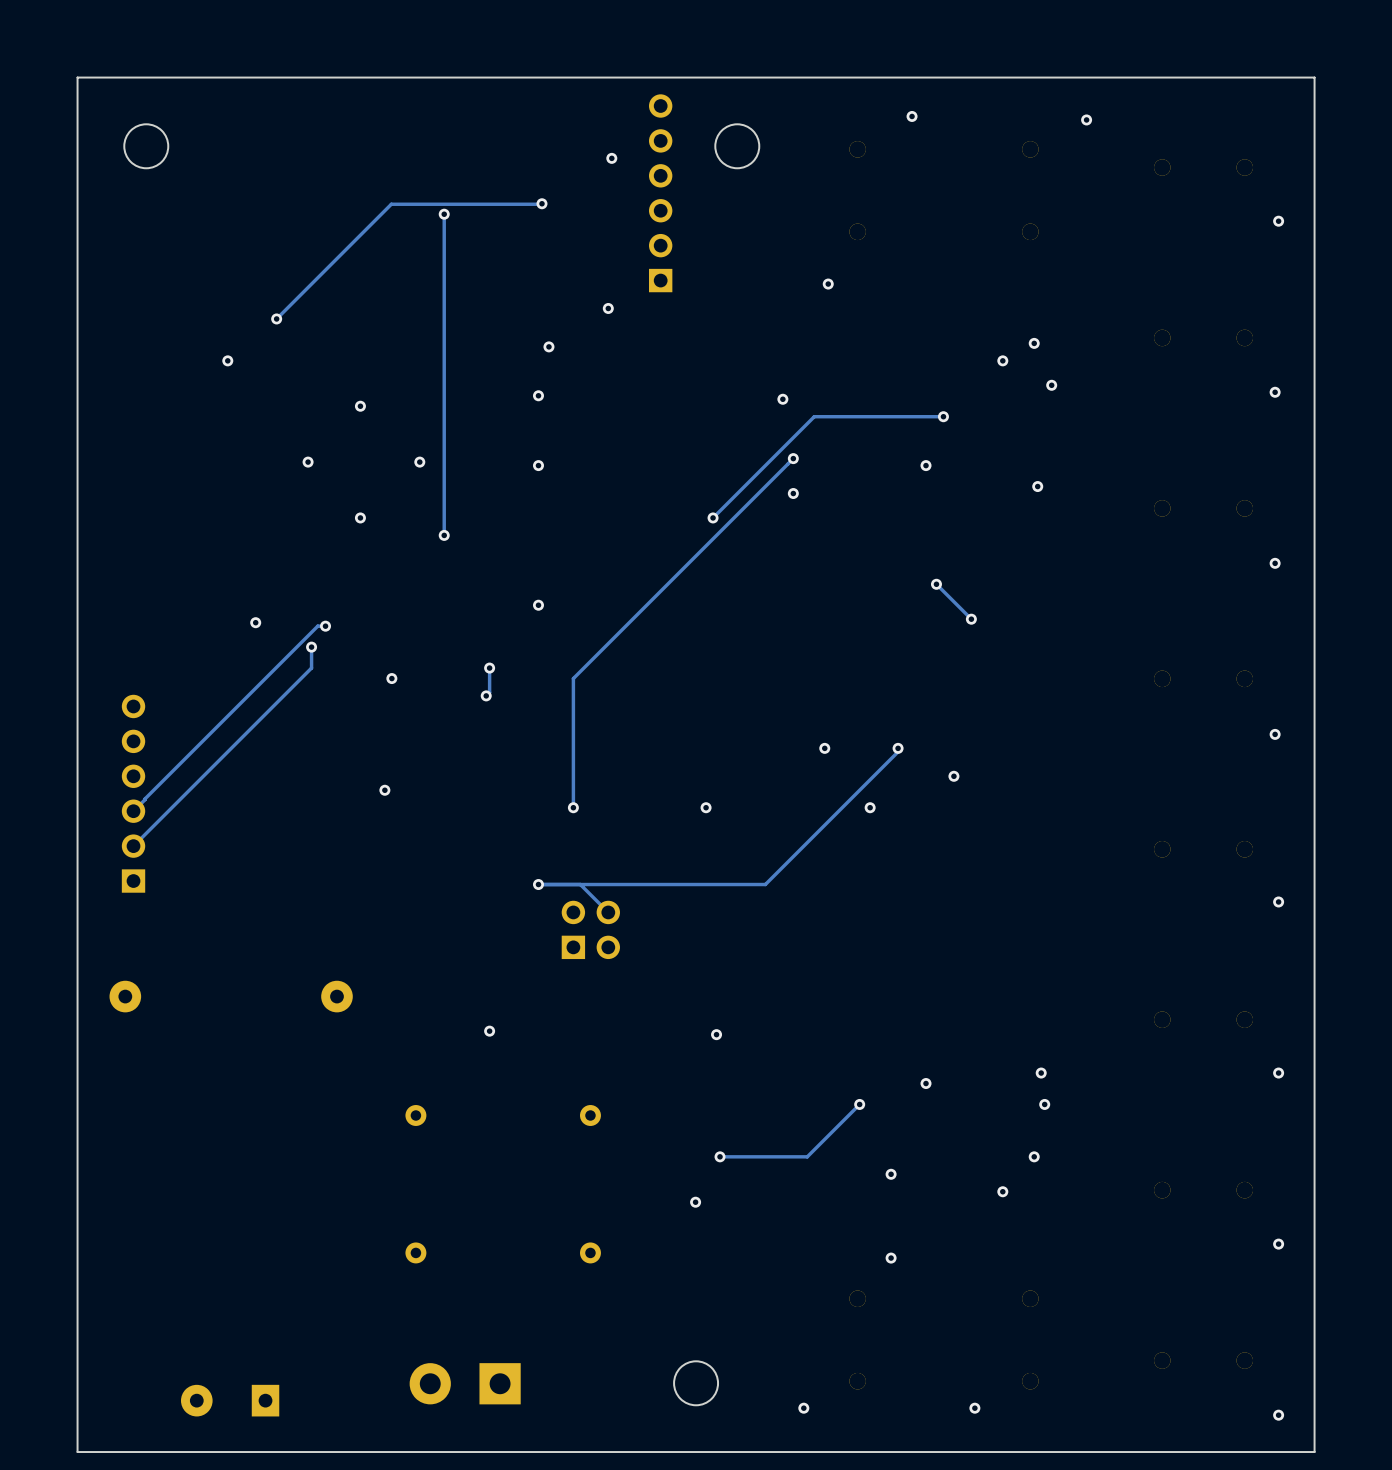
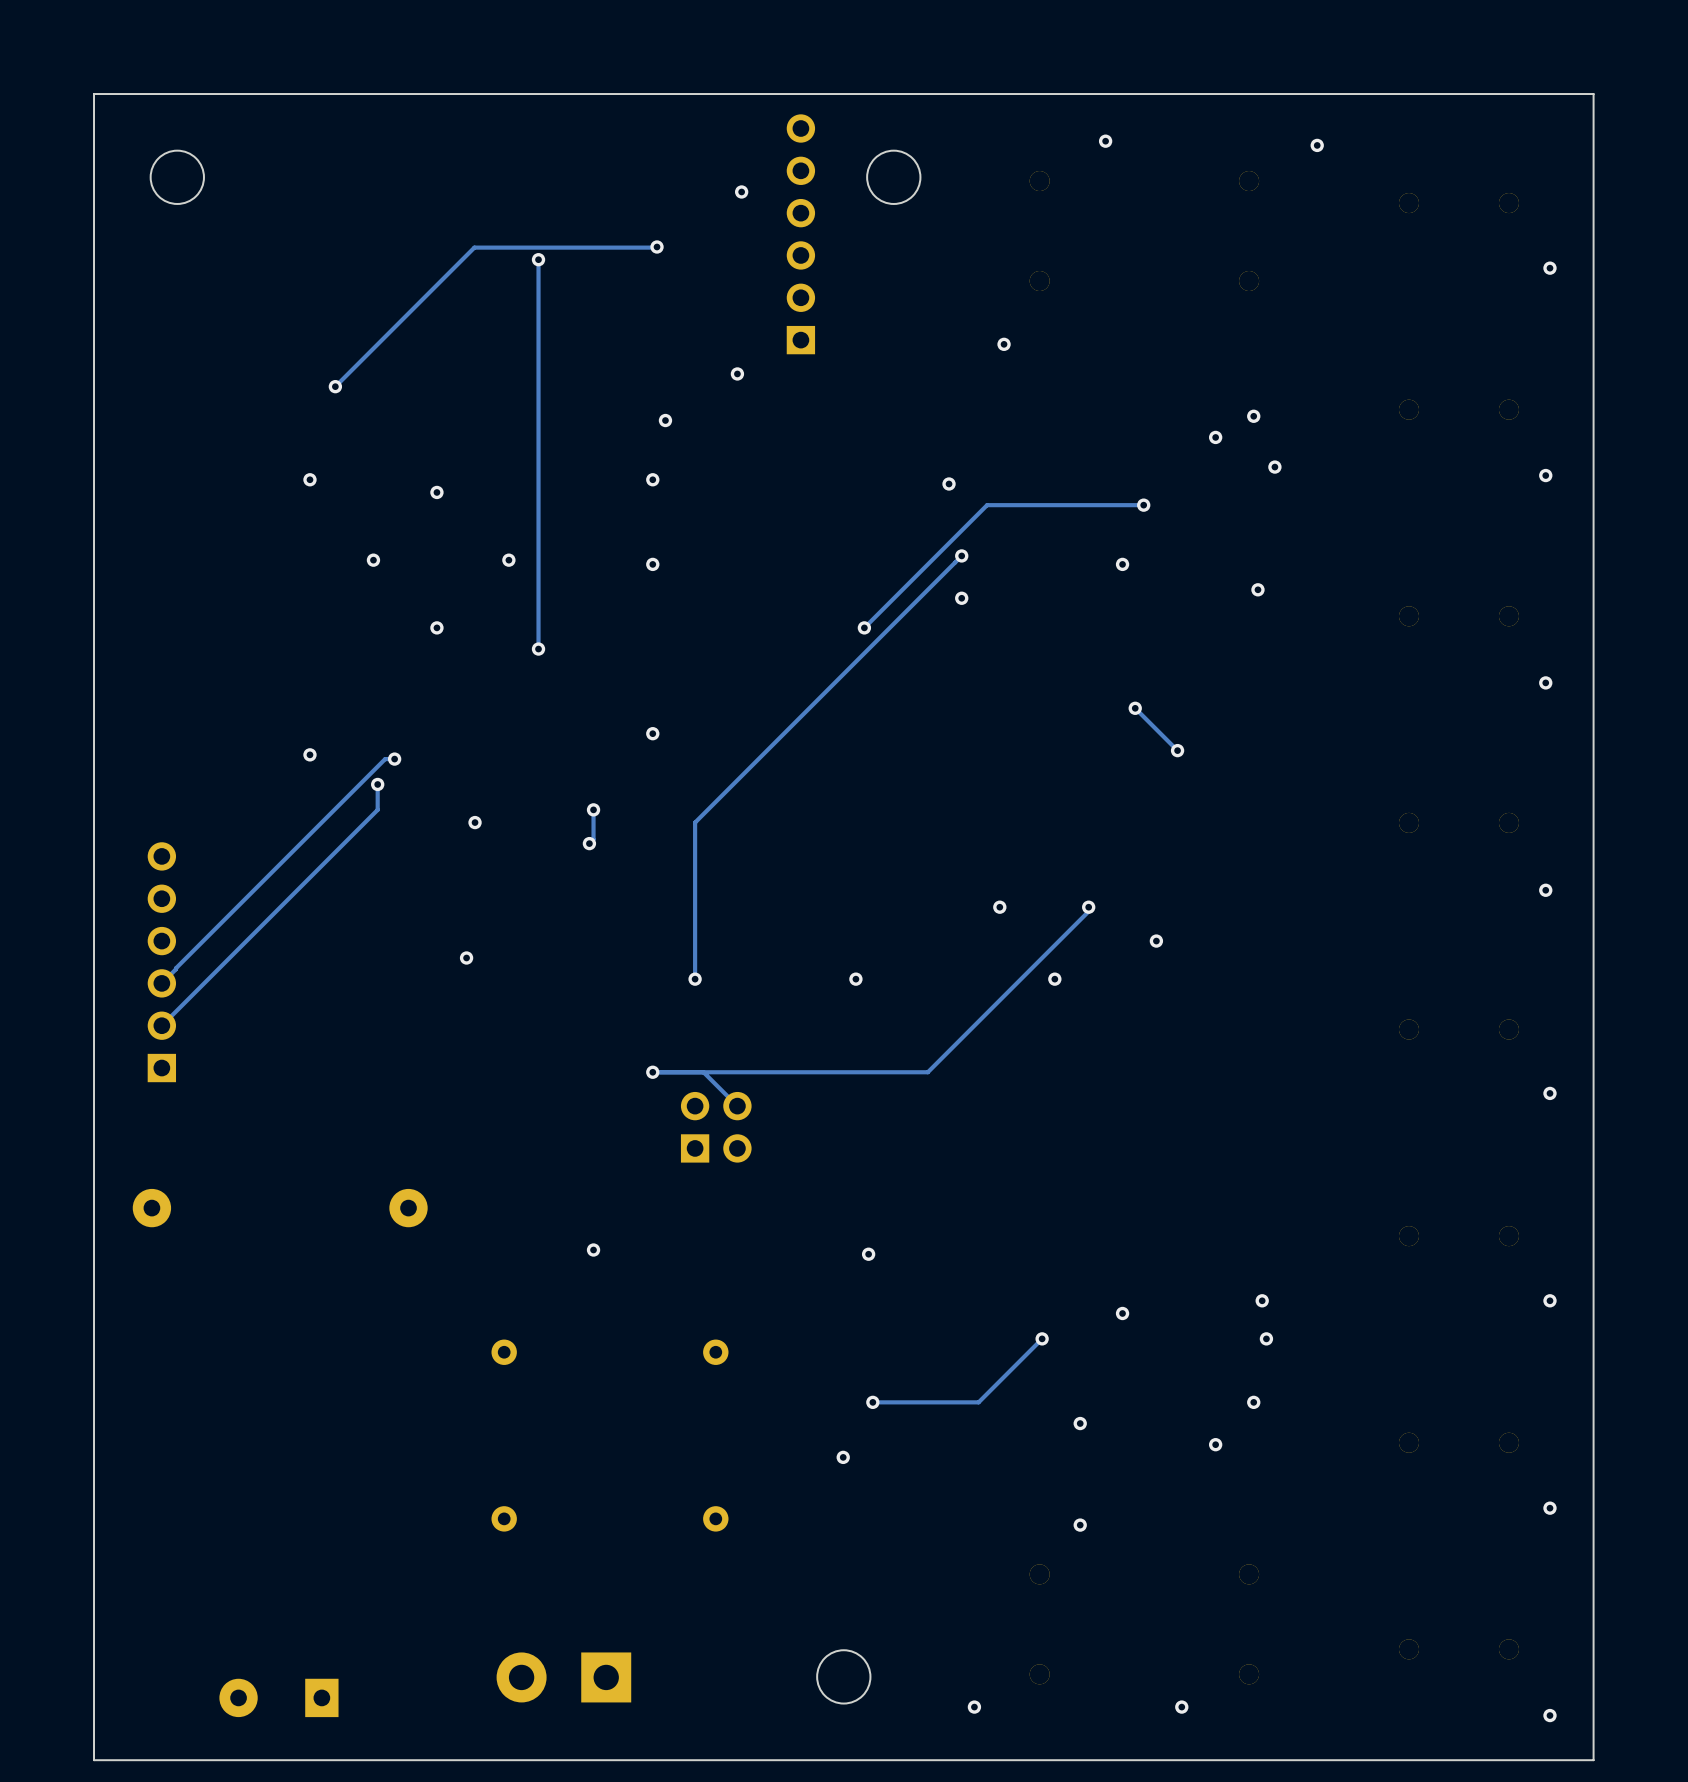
via position: (227, 360) -> (309, 479)

